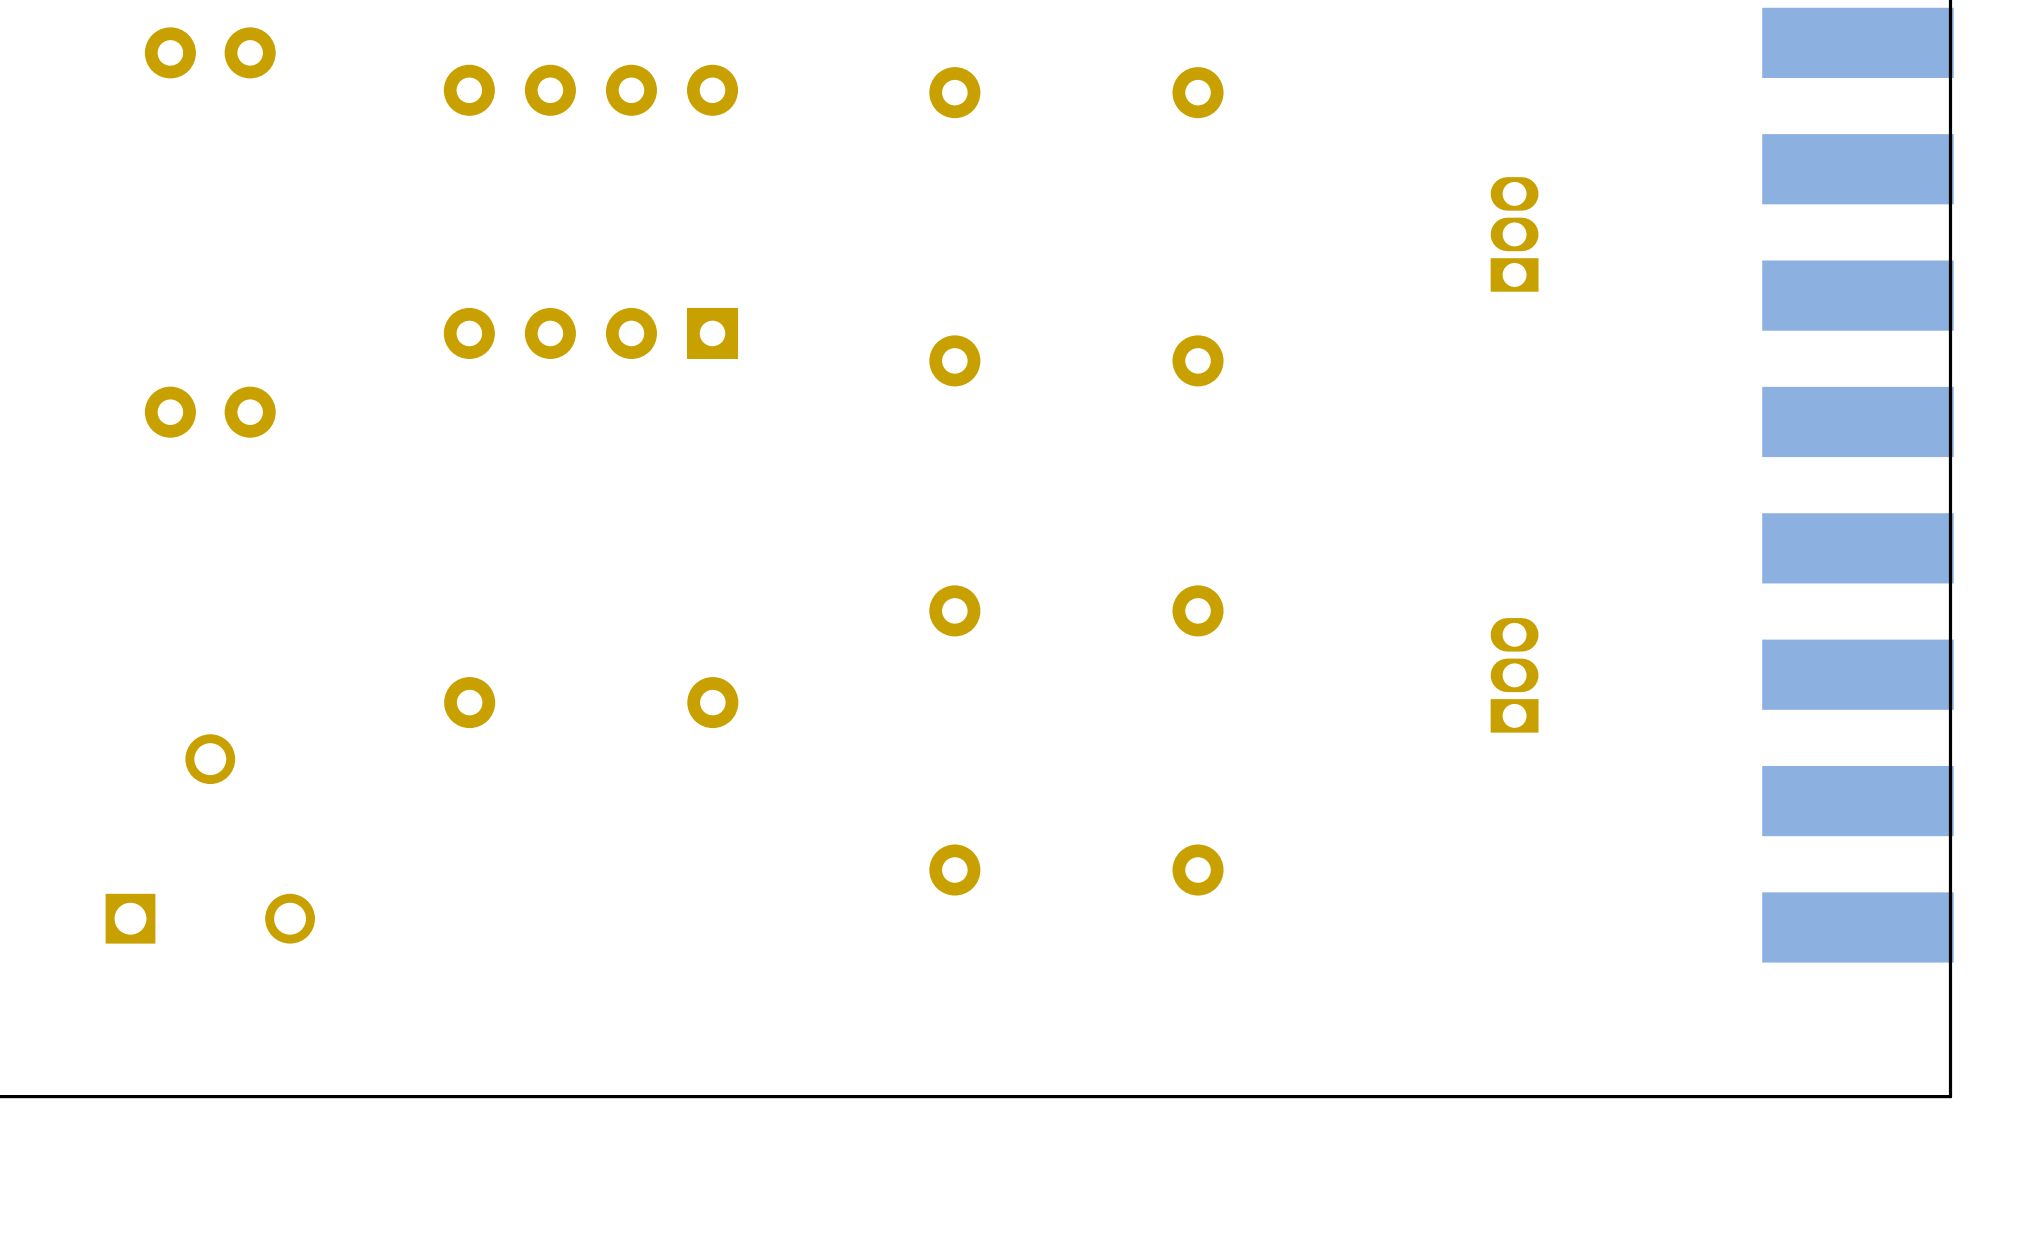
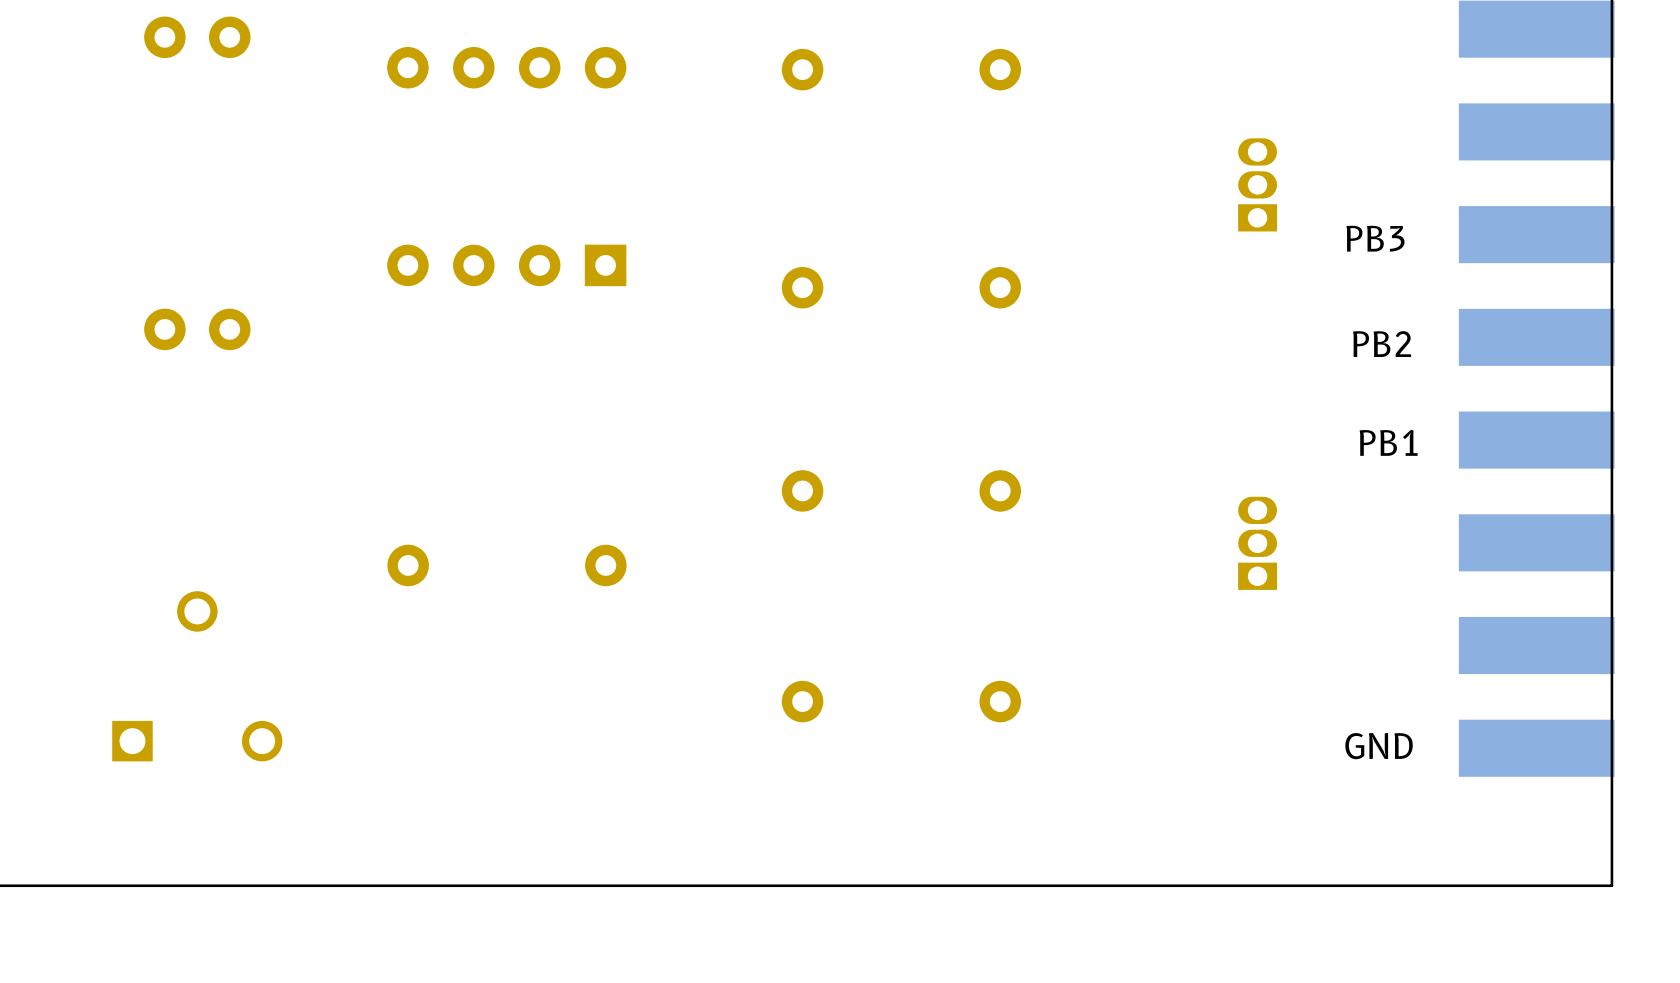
text: none -> PB3 (1375, 238)
text: none -> PB2 (1382, 344)
text: none -> PB1 (1388, 442)
text: none -> GND (1379, 746)

